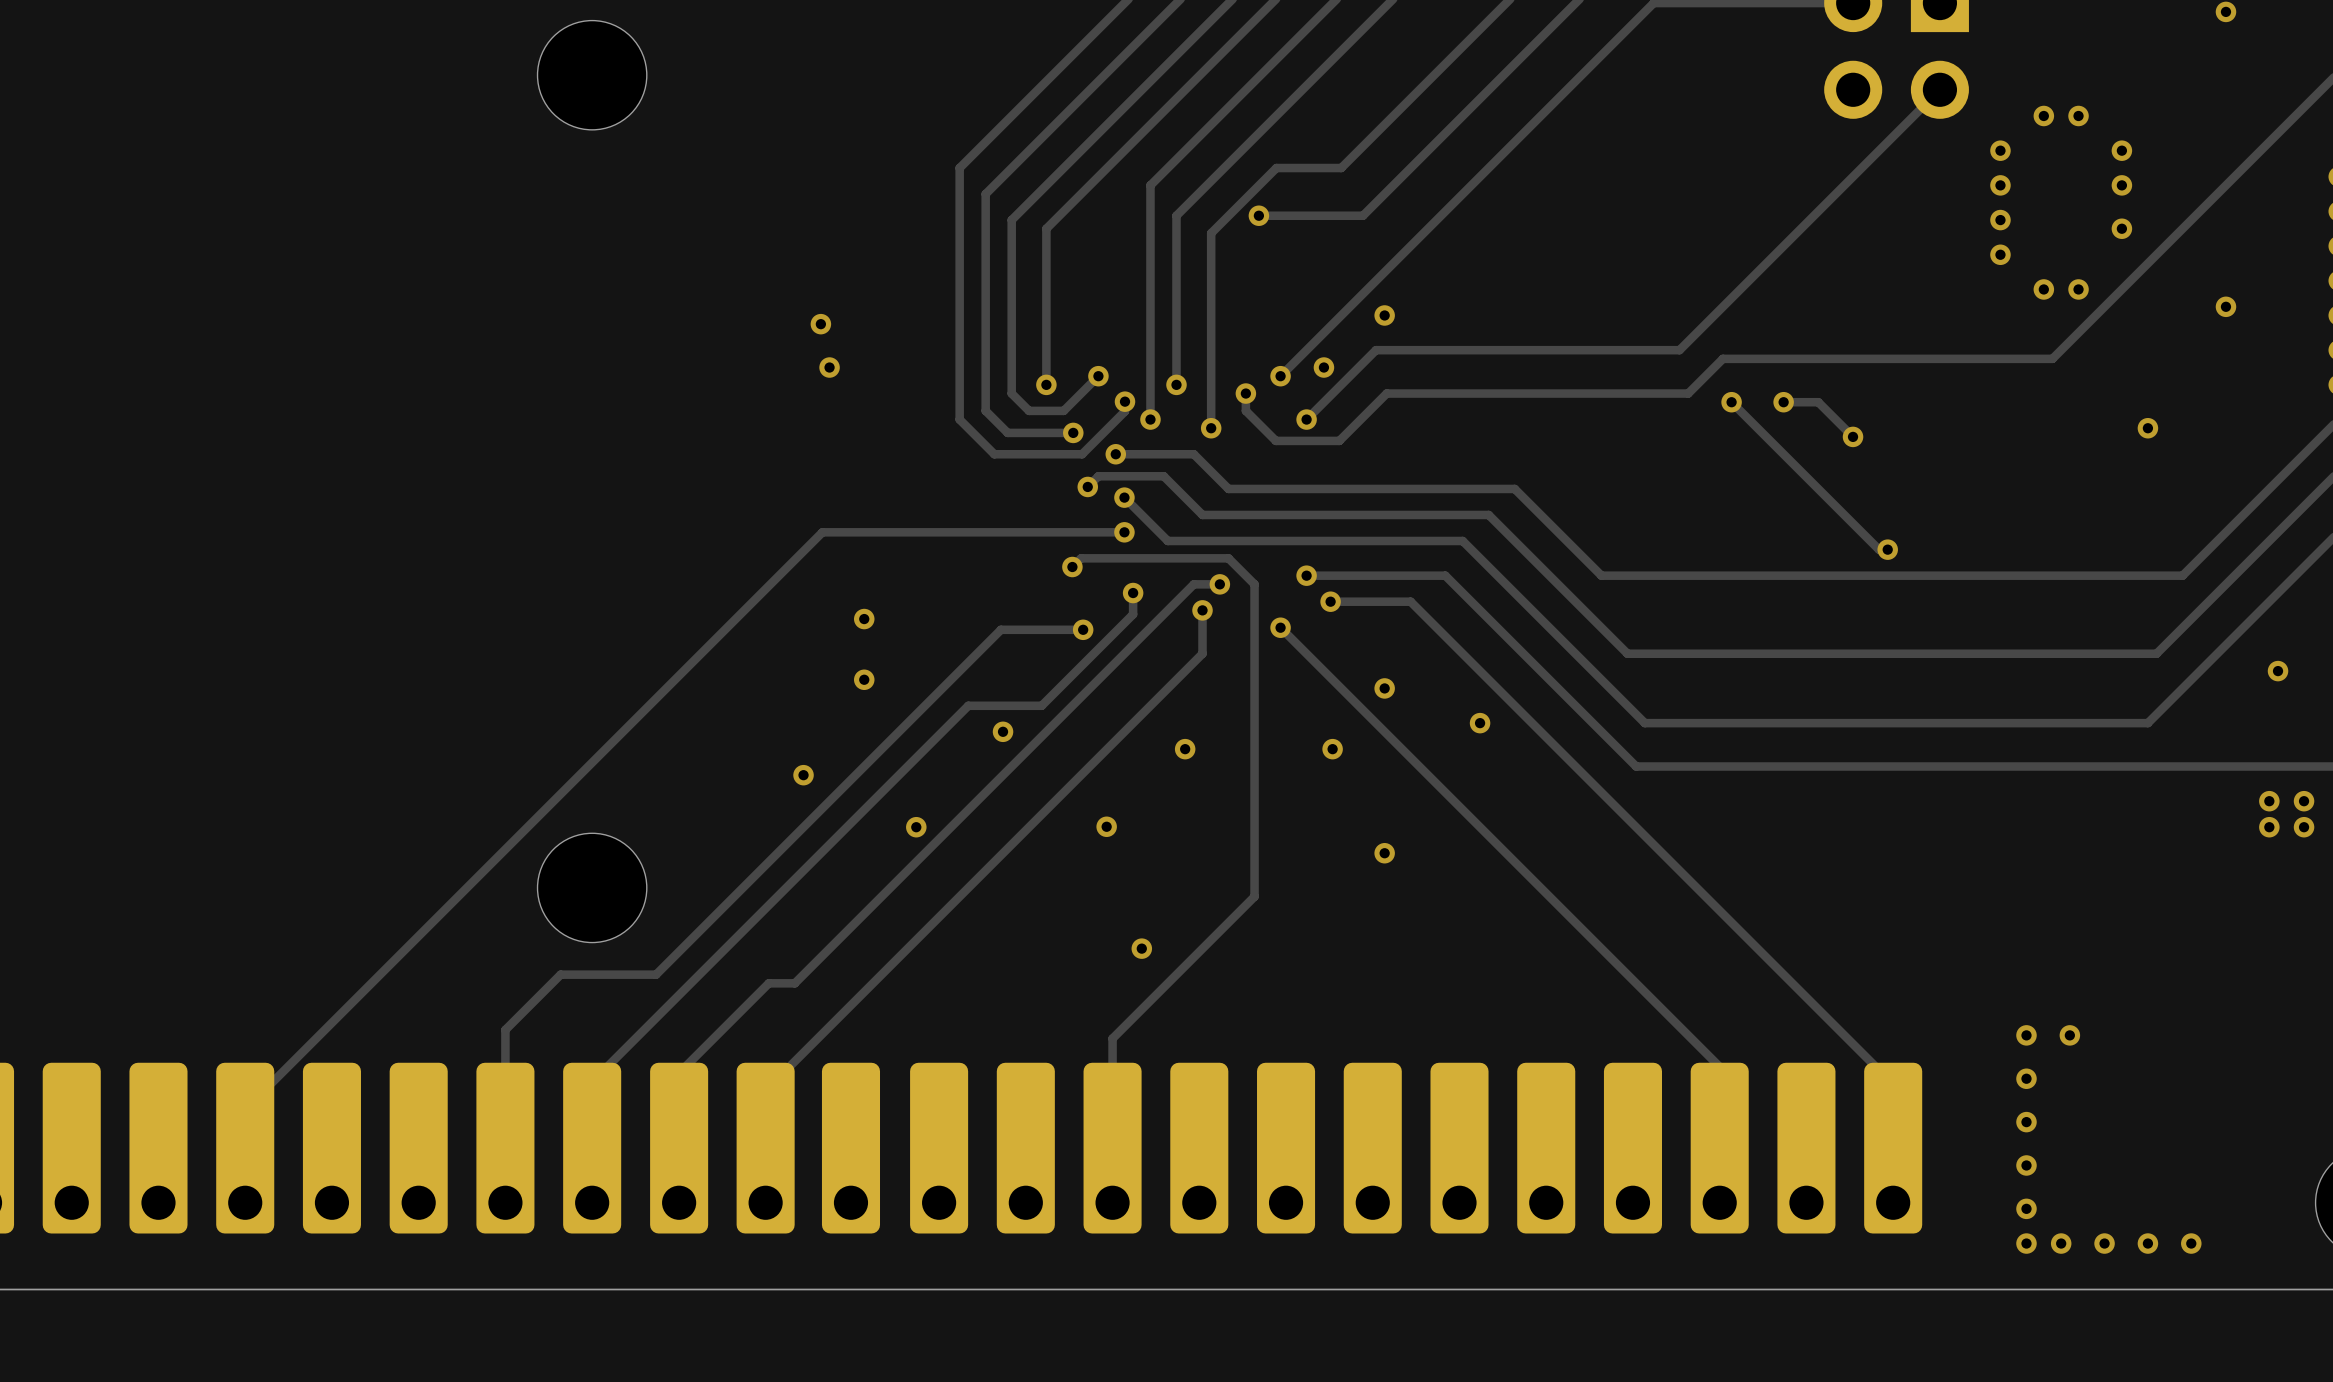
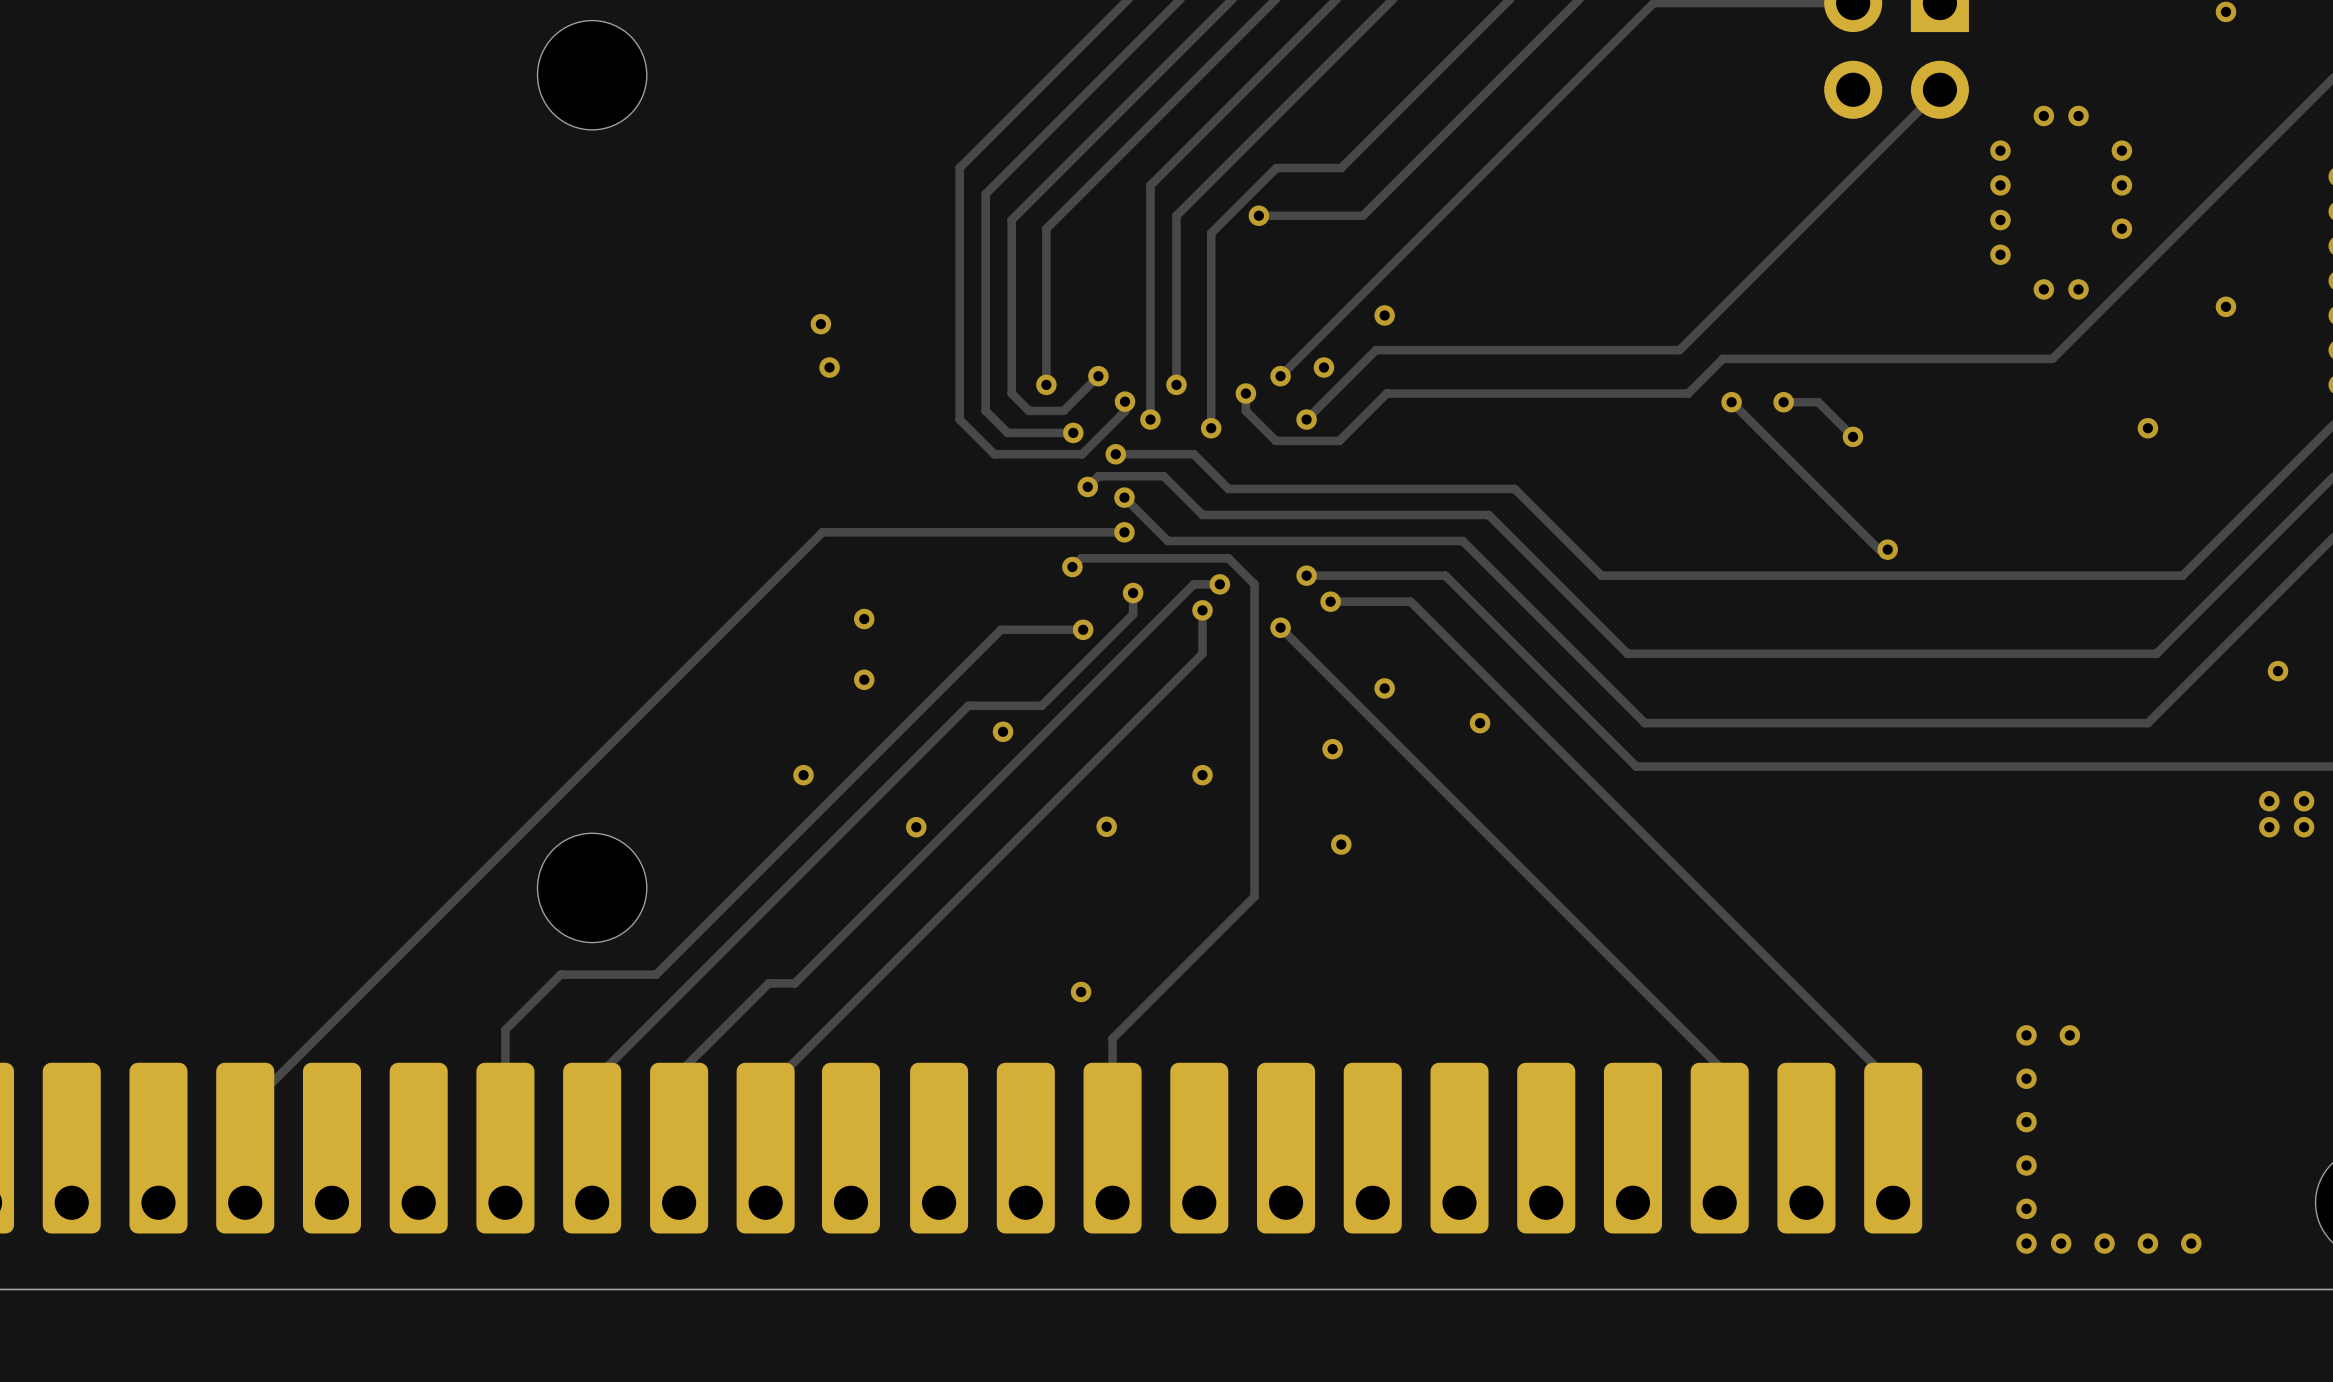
via position: (1185, 749) -> (1202, 775)
via position: (1384, 853) -> (1341, 844)
via position: (1141, 948) -> (1081, 992)

